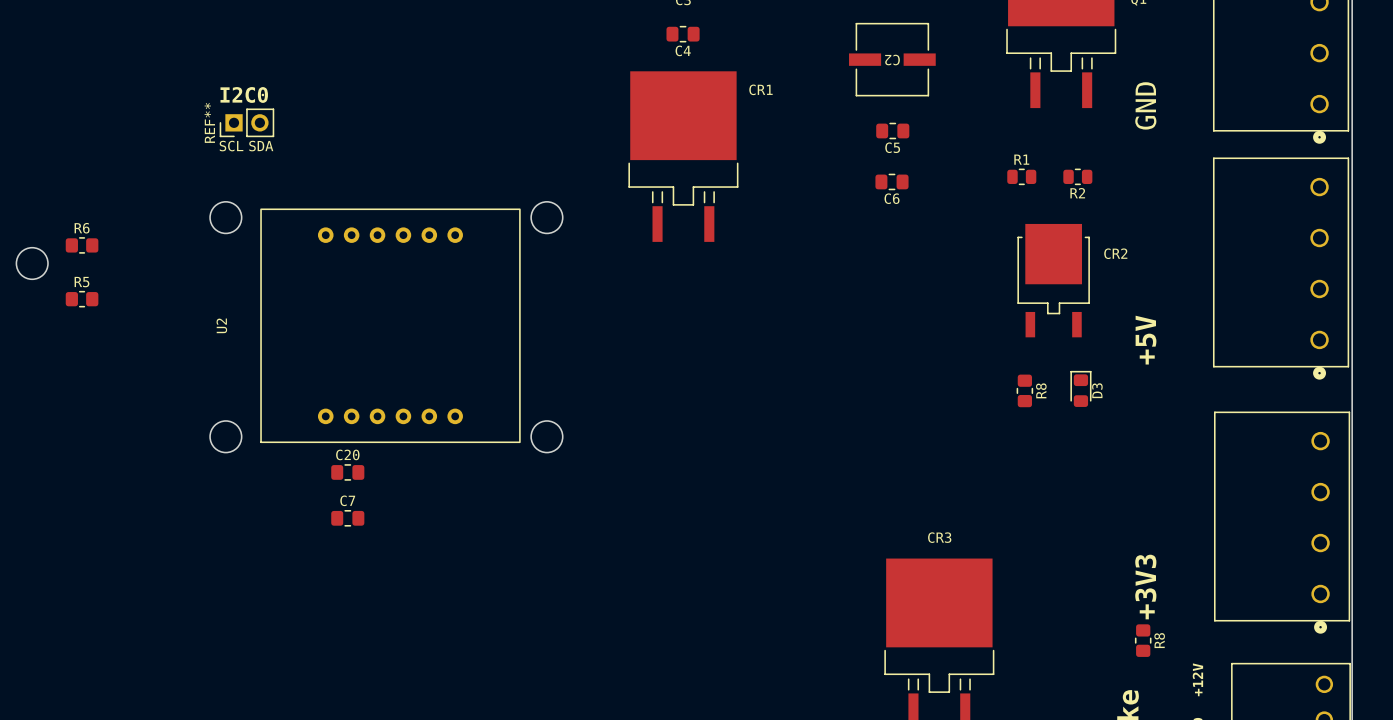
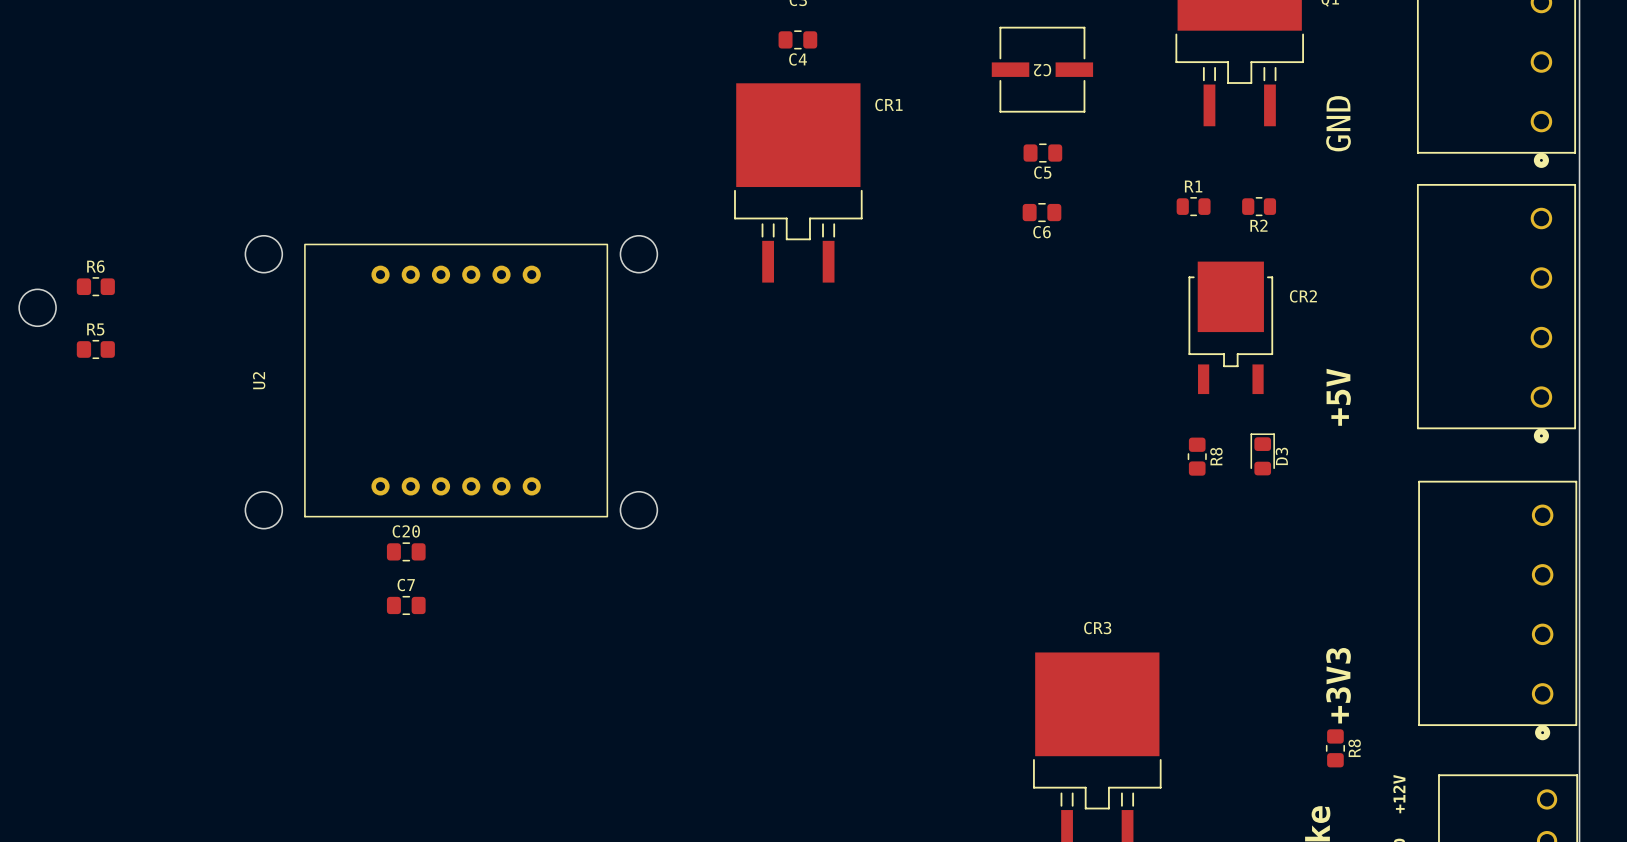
text: I2C0 (244, 94) -> none
REF**: (246, 122) -> none
text: SCL (231, 146) -> none
text: SDA (261, 146) -> none

